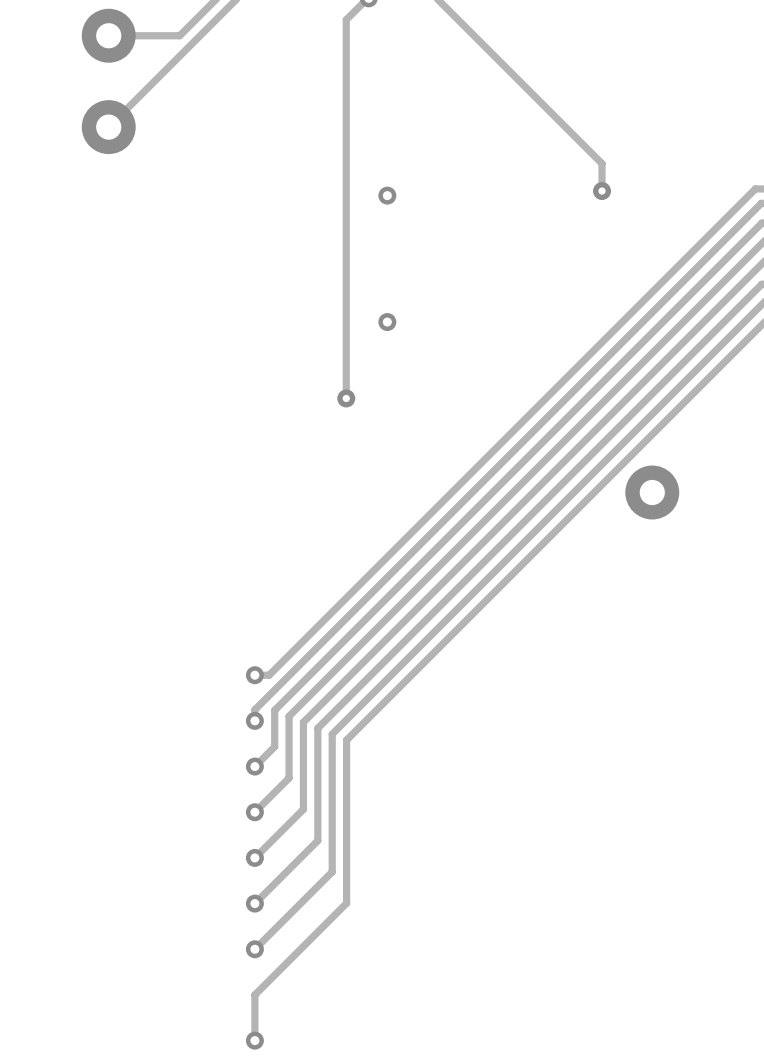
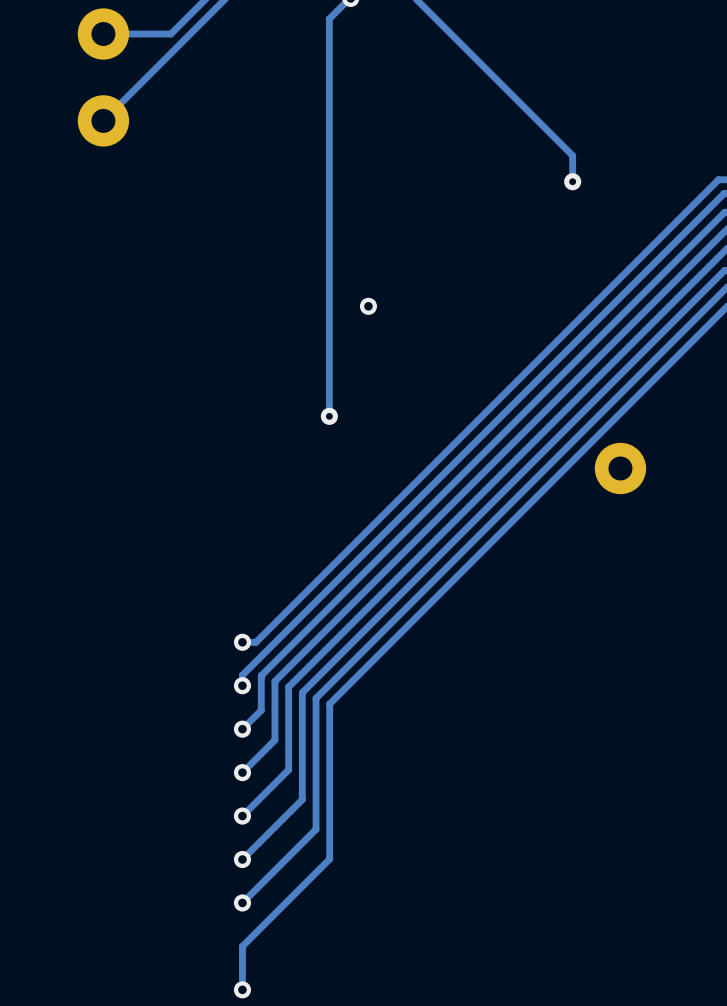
via: (387, 195) -> none
track: none -> (329, 379) (329, 416)
via position: (346, 398) -> (329, 416)

